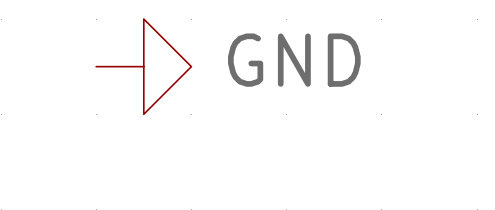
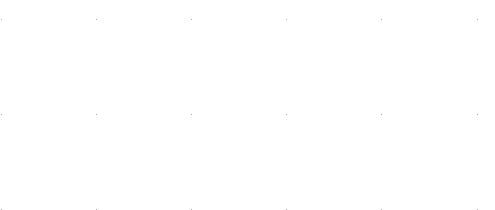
power symbol: GND (143, 66) -> none

